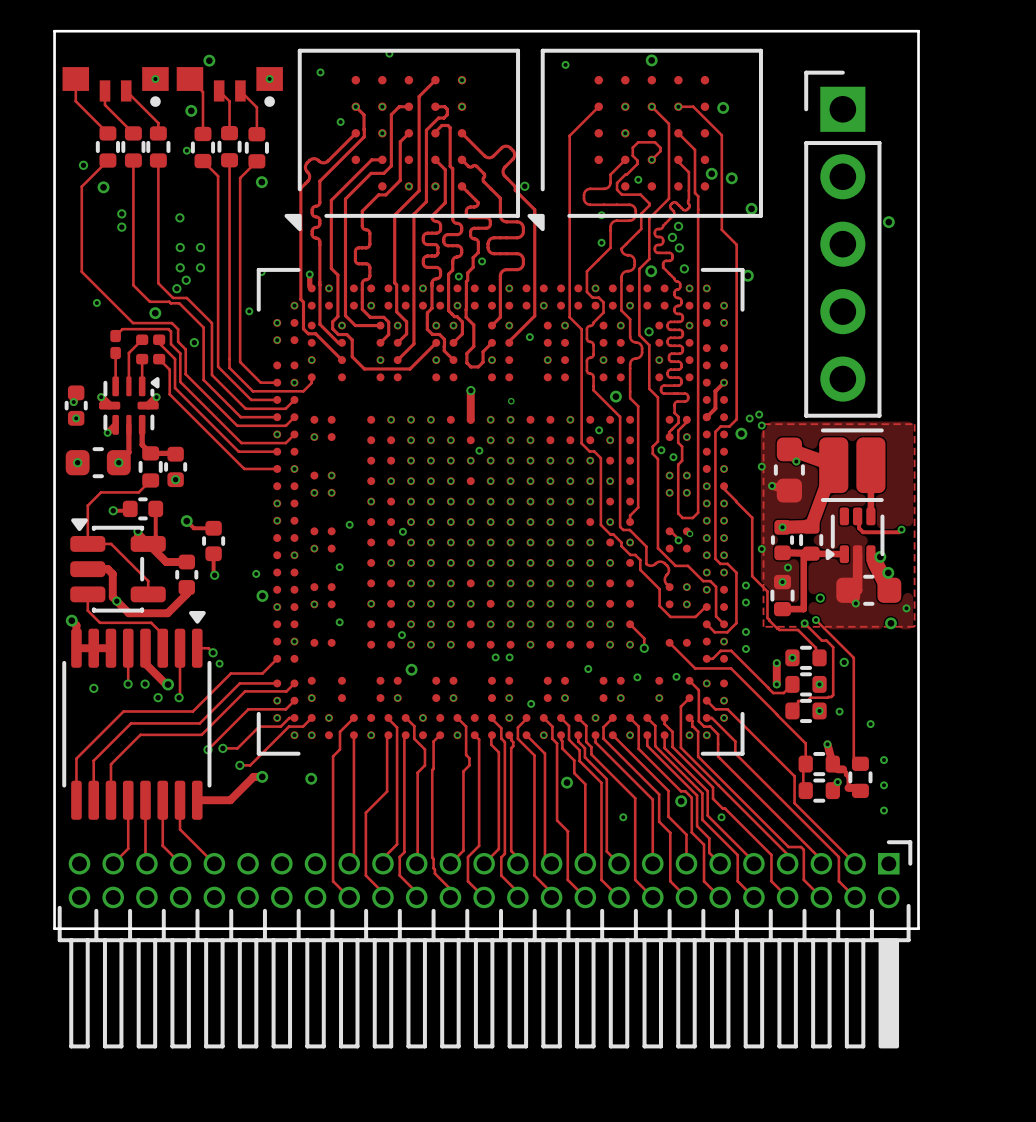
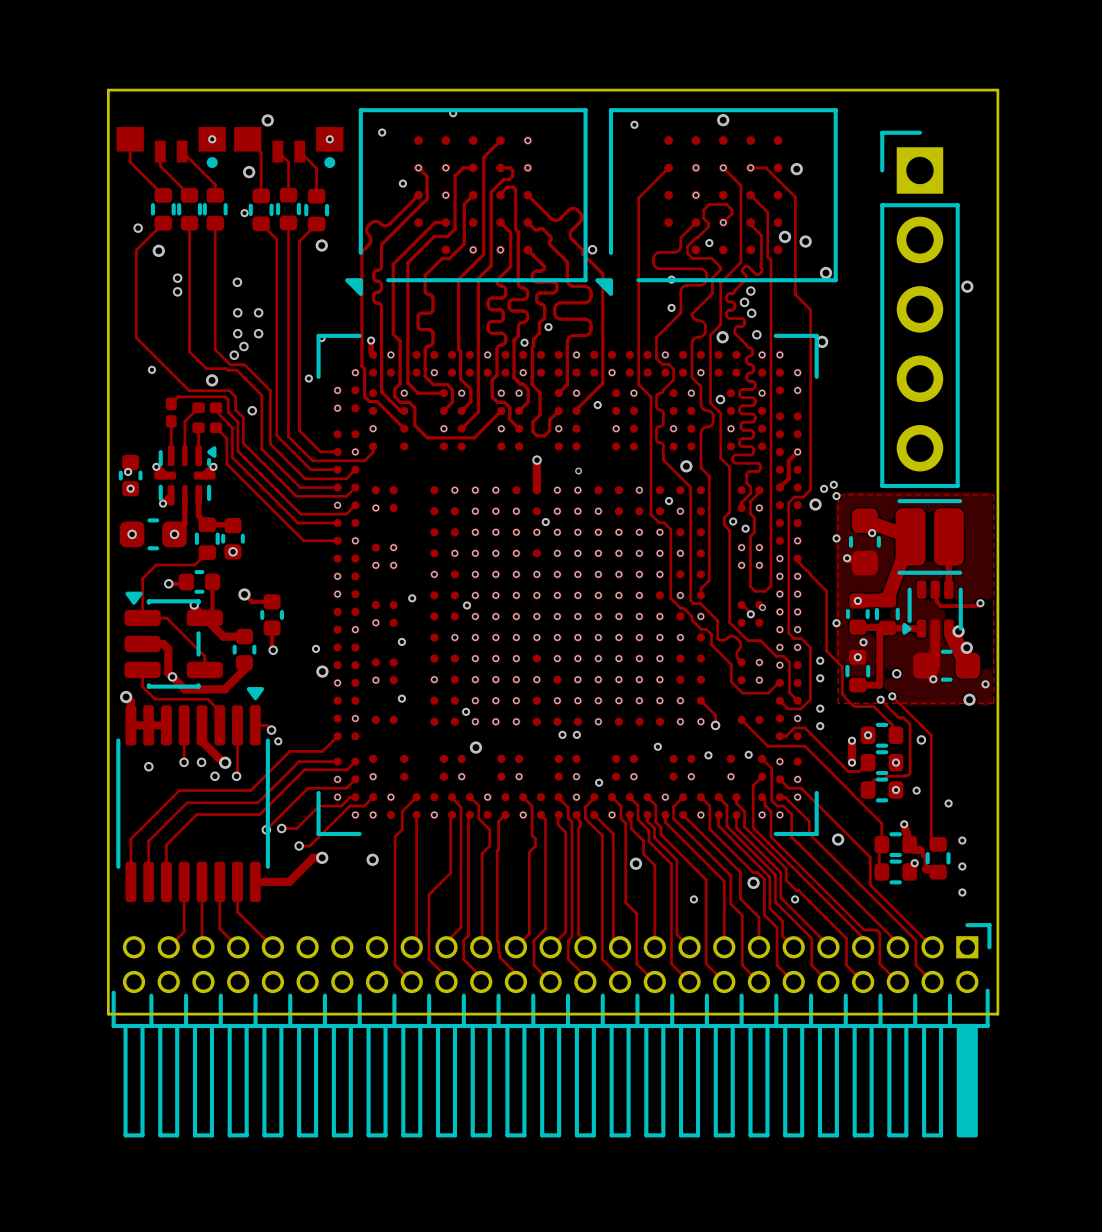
via: none -> (838, 839)

